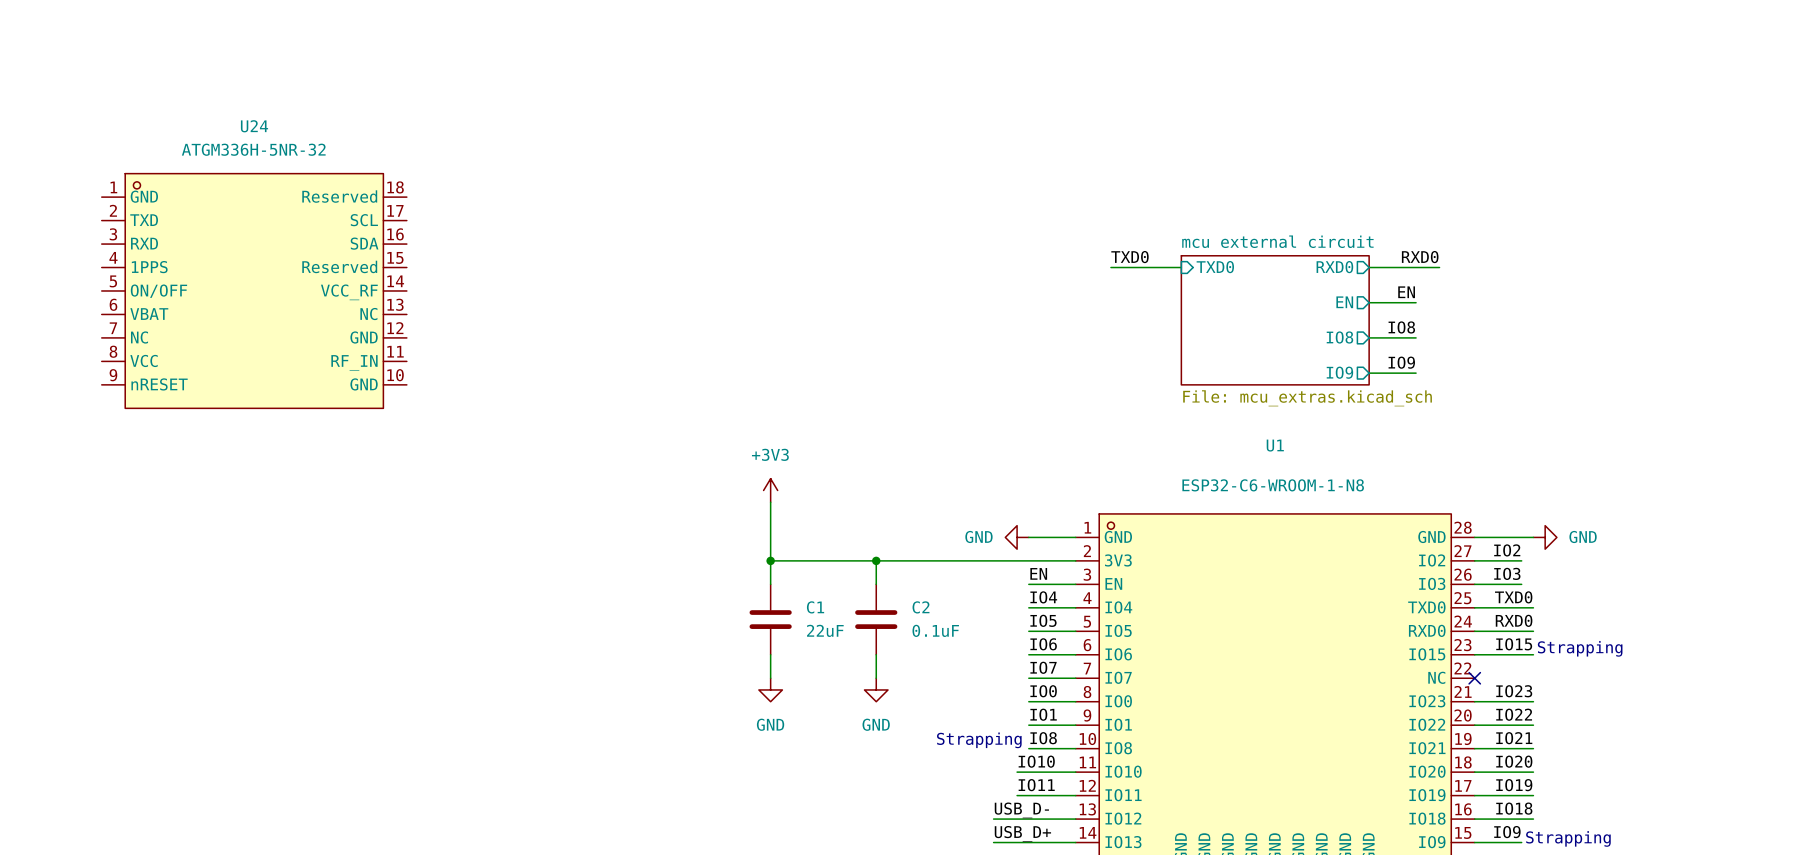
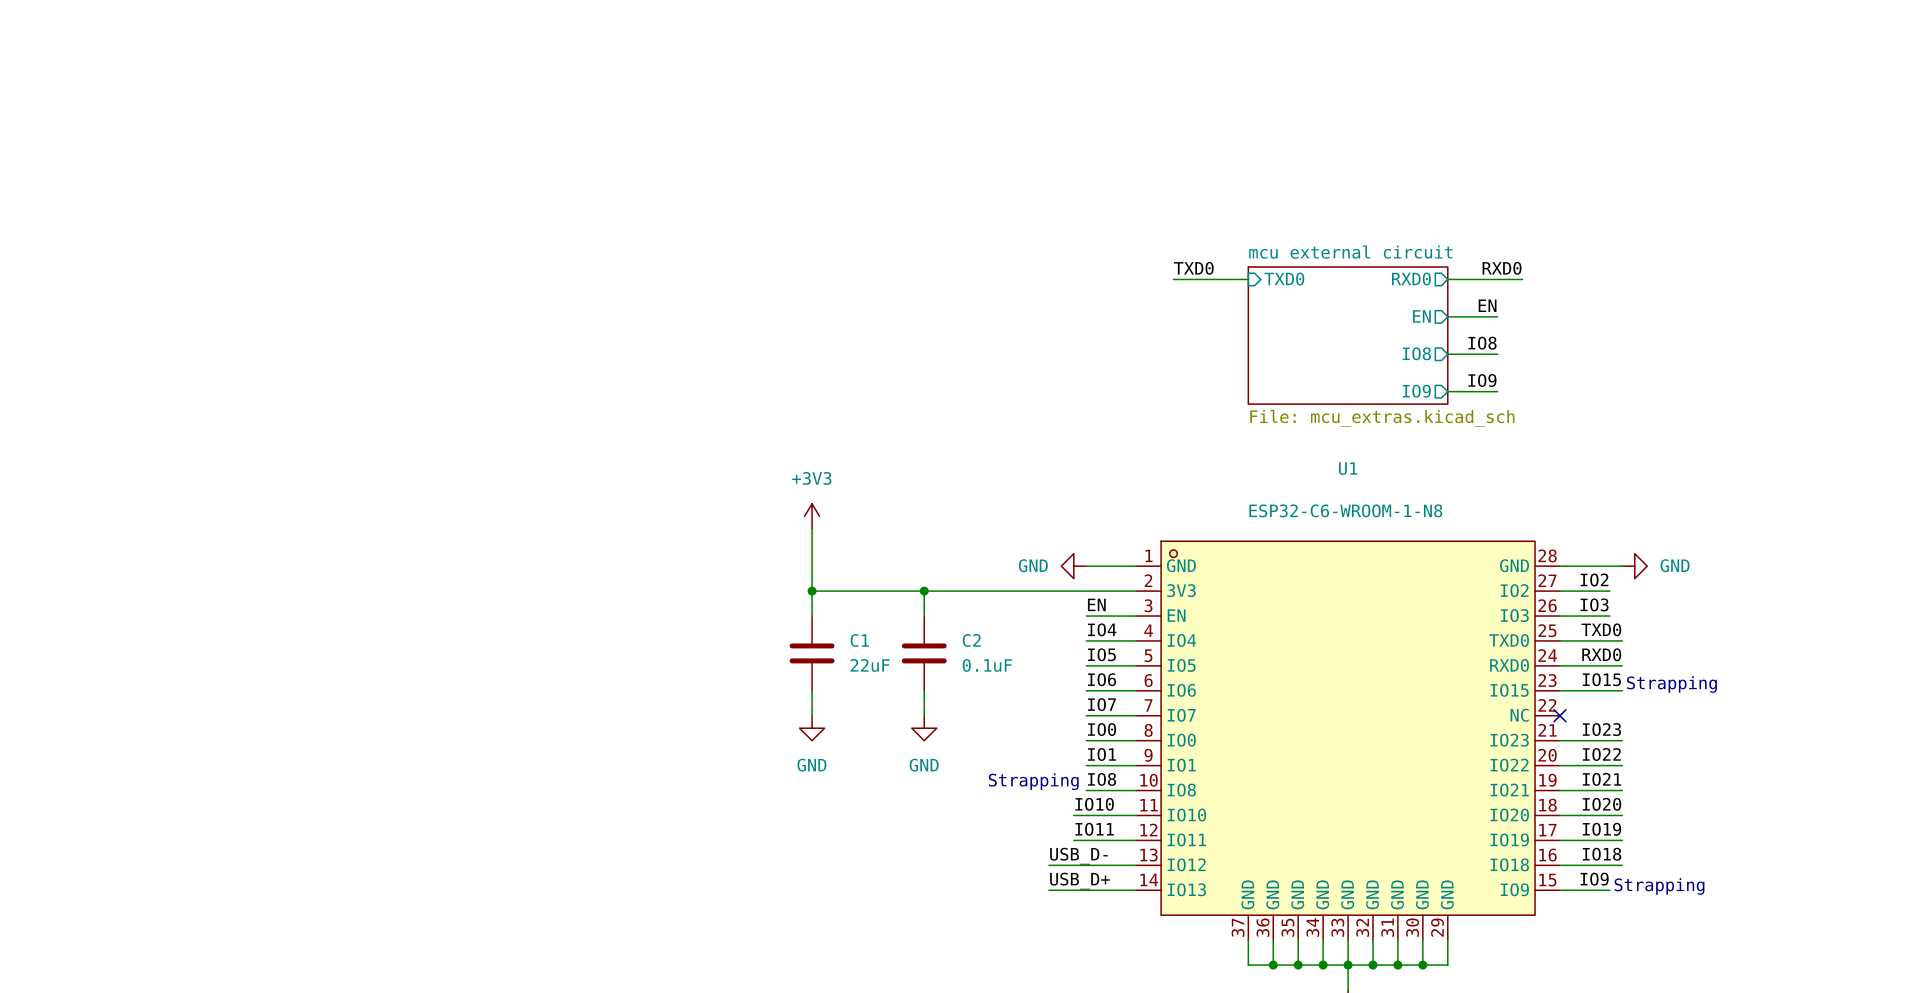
U24: ATGM336H-5NR-32 (254, 290) -> none

